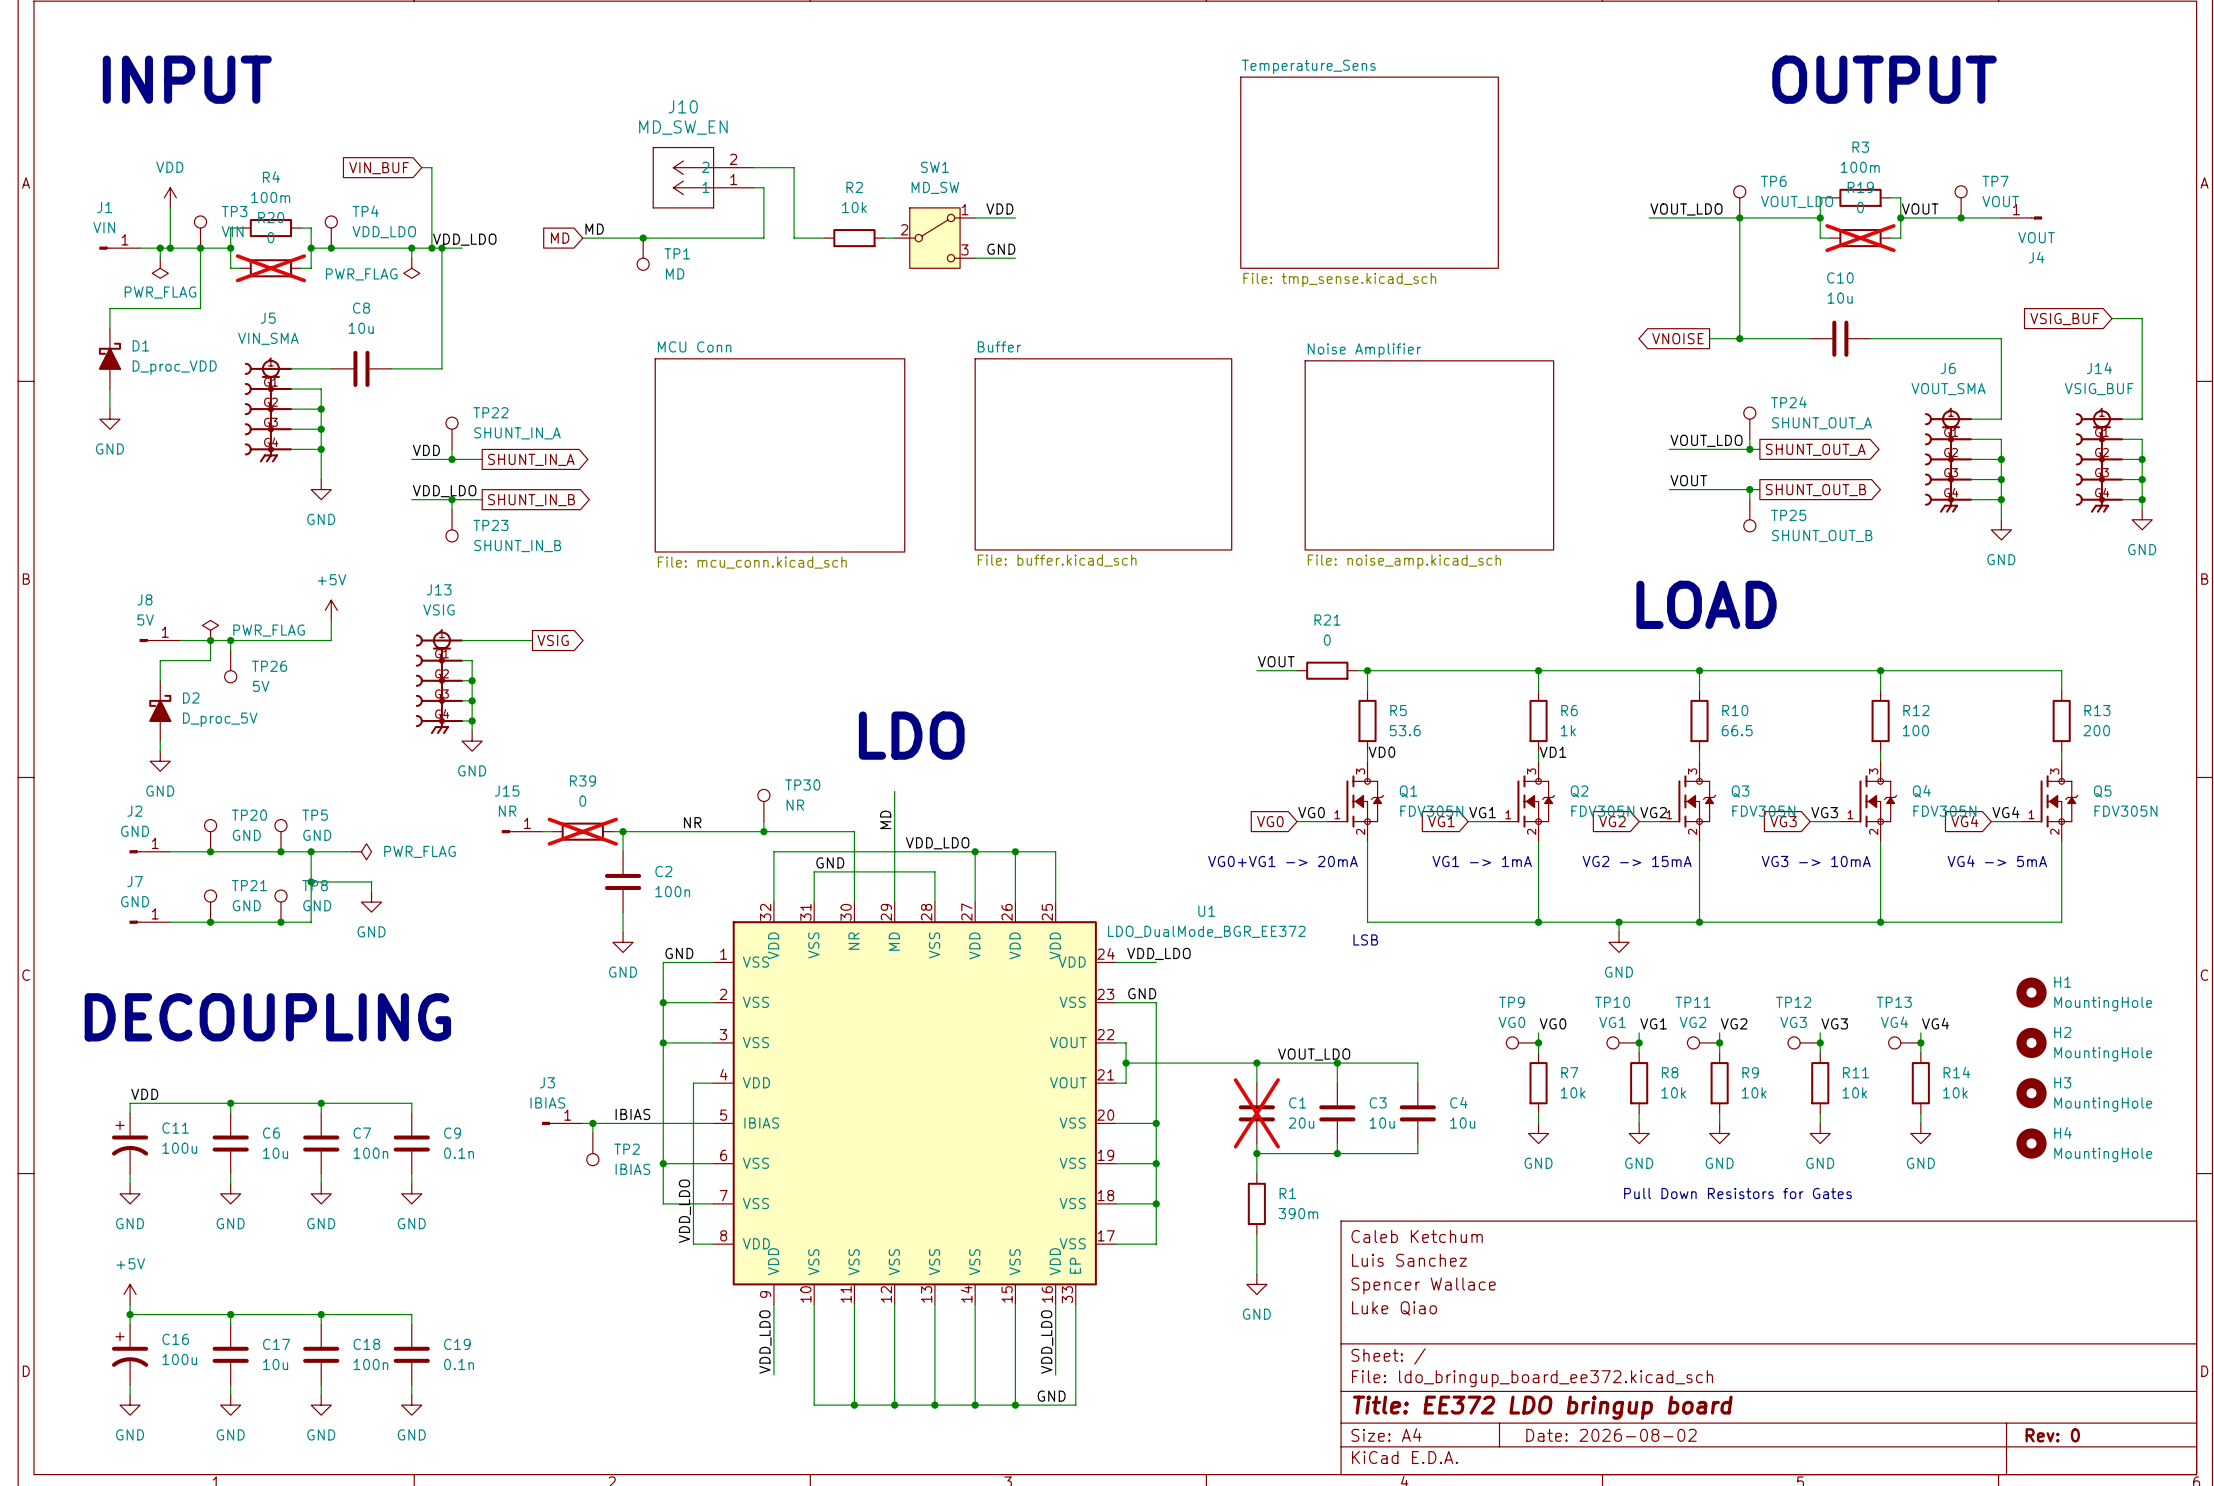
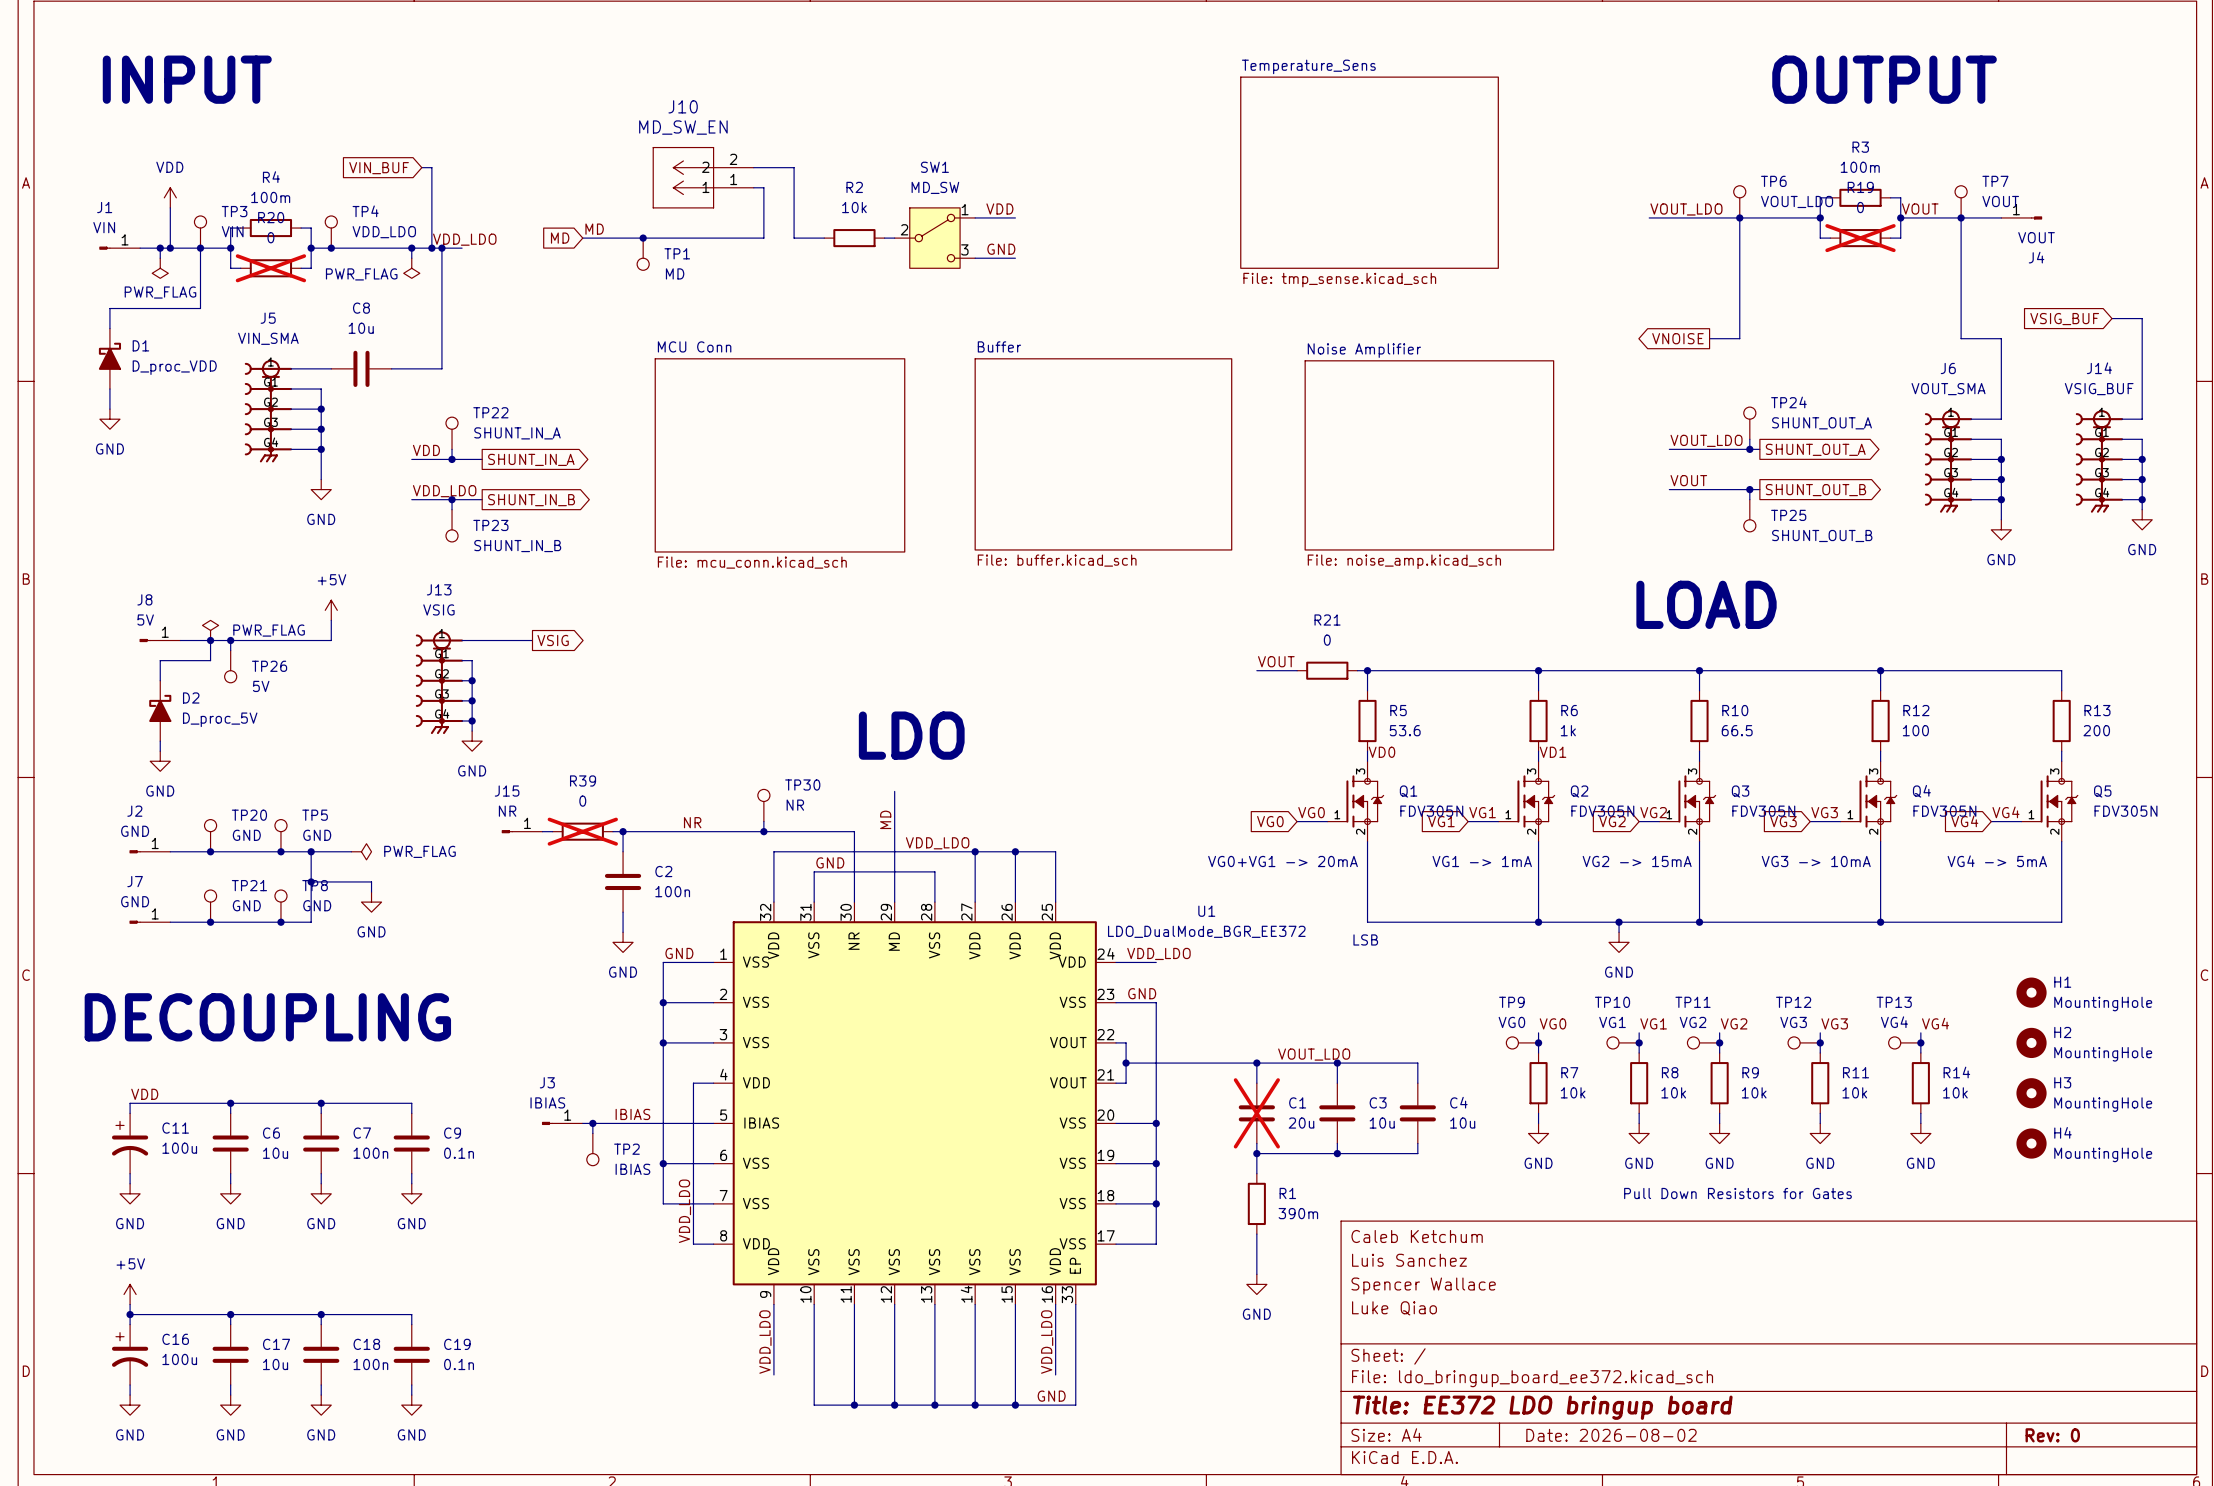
wire: (1739, 338) (1810, 338) -> none
junction: (1739, 338) -> none
C10: 10u (1840, 338) -> none
wire: (1870, 338) (1961, 338) -> (1961, 217) (1961, 338)

